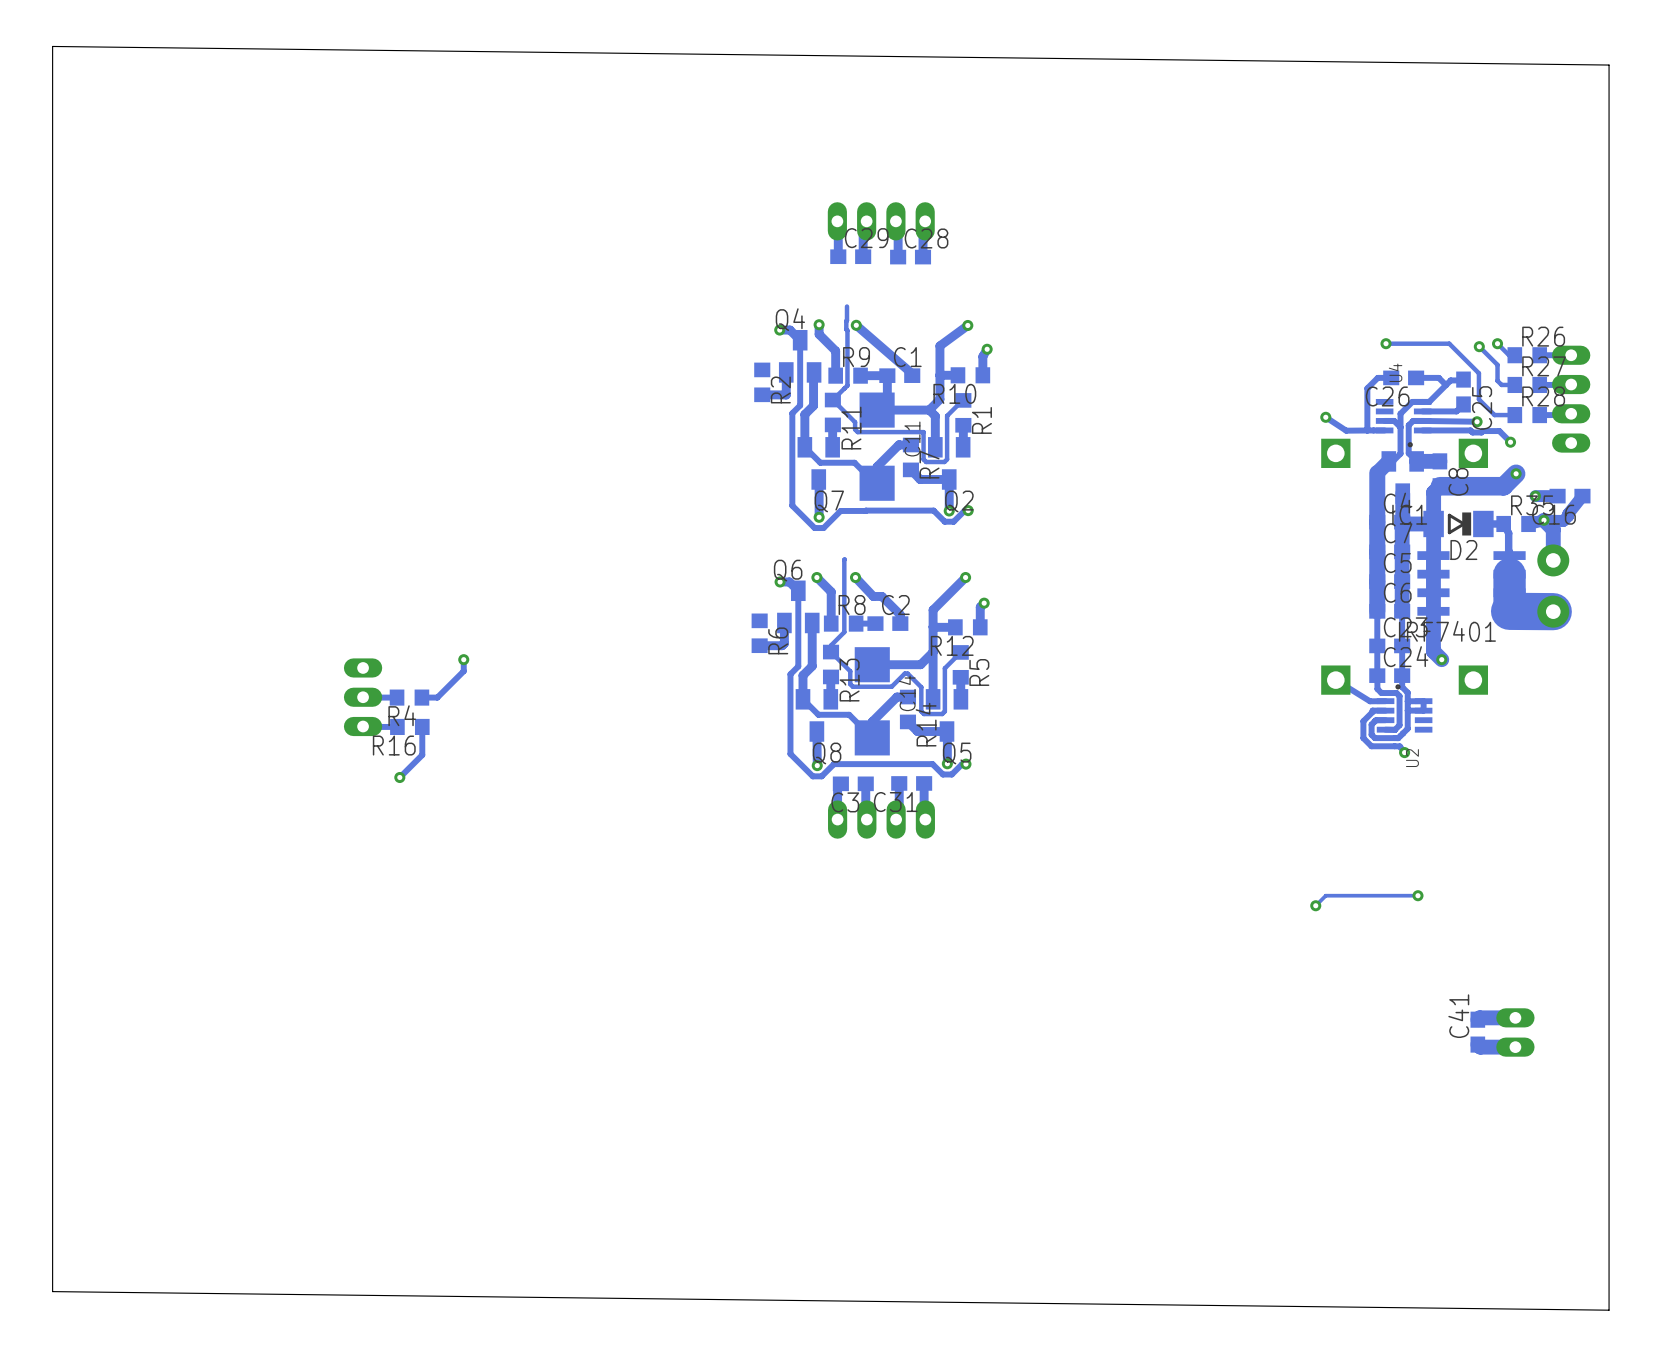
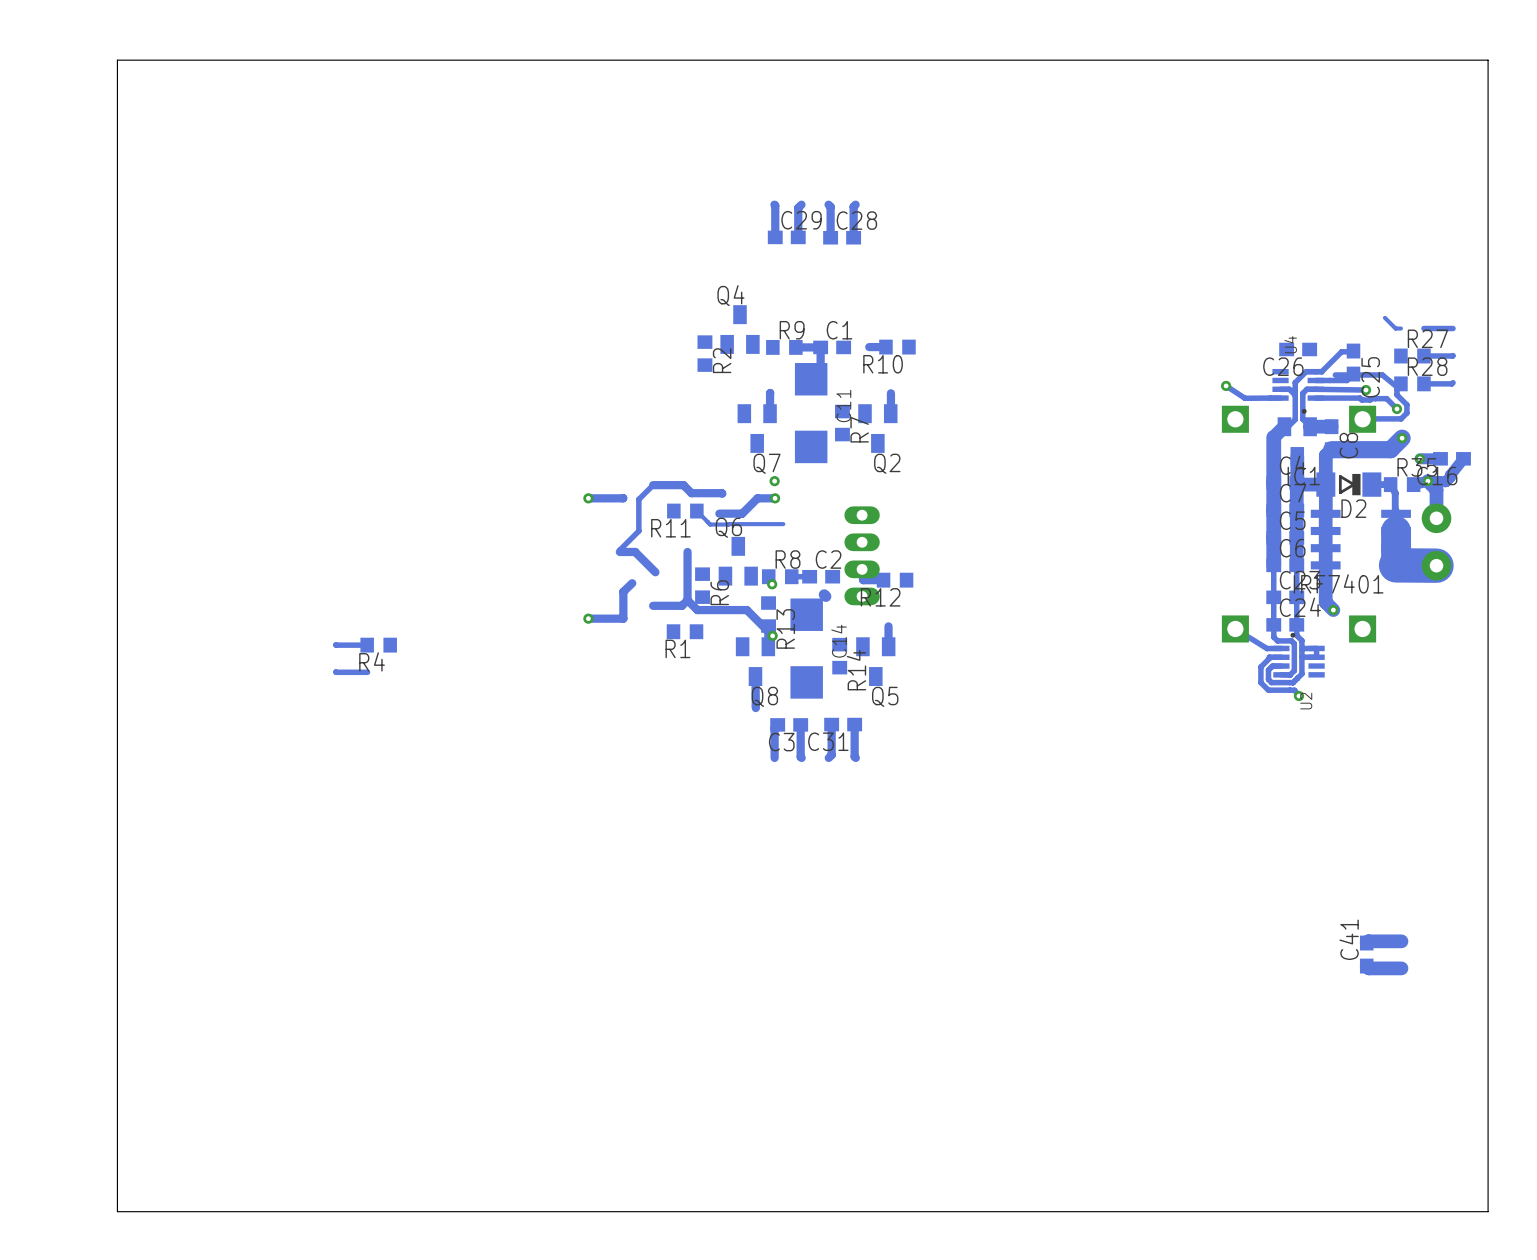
board edge: (1609, 65) (52, 46) (52, 1291) (1609, 1310) -> (1488, 60) (117, 60) (117, 1211) (1488, 1211)
part: (881, 221) -> none
track: (847, 306) (847, 385) (832, 400) (855, 422) (855, 429) (857, 432) (923, 432) (923, 459) (926, 462) (944, 462) (947, 459) (947, 415) (963, 400) -> none
track: (819, 324) (819, 334) (835, 350) (835, 375) -> none
via: (819, 324) -> none
track: (856, 325) (912, 375) -> none
via: (856, 325) -> none
track: (967, 325) (939, 345) (939, 399) (929, 410) -> none
via: (967, 325) -> none
track: (779, 330) (789, 330) (800, 340) (800, 405) (792, 413) (792, 505) (814, 528) (823, 528) (840, 510) (933, 510) (944, 521) (953, 521) (964, 510) (968, 510) -> none
via: (779, 330) -> none
track: (1386, 343) (1449, 343) (1478, 373) (1478, 399) (1494, 415) (1514, 415) -> none
via: (1386, 343) -> none
via: (1497, 343) -> none
track: (1479, 346) (1497, 364) (1497, 380) (1501, 384) (1514, 384) -> none
via: (1479, 346) -> none
track: (987, 349) (982, 356) (982, 375) -> none
via: (987, 349) -> none
R26: (1527, 355) -> none
track: (786, 372) (786, 394) (762, 394) -> none
track: (814, 372) (813, 405) (804, 414) (804, 447) (820, 462) (854, 462) (877, 483) (877, 466) (899, 444) -> none
track: (1391, 377) (1377, 377) (1367, 388) (1367, 430) -> none
track: (1416, 377) (1438, 377) (1446, 385) -> none
part: (1571, 399) -> none
track: none -> (1335, 374) (1382, 374) (1396, 386) (1396, 394) (1406, 404) (1406, 413) (1401, 418) (1362, 418)
track: (929, 410) (877, 410) -> none
track: (929, 410) (935, 416) (935, 447) -> none
R11 rotation: 0° (832, 412) -> 90° clockwise (685, 511)
R11 position: (832, 412) -> (685, 511)
R1 rotation: 0° (963, 412) -> 90° clockwise (685, 631)
R1 position: (963, 412) -> (685, 631)
track: (910, 469) (920, 479) (949, 479) (949, 510) -> none
track: (818, 479) (819, 517) -> none
via: (949, 510) -> none
via: (968, 510) -> none
via: (819, 517) -> none
via: none -> (774, 481)
track: none -> (722, 493) (691, 493) (683, 485) (653, 485) (638, 499) (638, 531) (619, 551) (635, 551) (655, 572)
via: none -> (588, 498)
track: none -> (623, 498) (588, 498)
track: none -> (775, 498) (757, 498) (742, 513) (719, 513)
via: none -> (775, 498)
track: none -> (696, 511) (710, 524) (783, 524)
track: (844, 559) (844, 632) (831, 645) (831, 652) (850, 671) (850, 684) (852, 686) (891, 686) (904, 673) (907, 673) (921, 687) (921, 711) (923, 714) (942, 714) (944, 711) (944, 668) (960, 652) -> none
track: (816, 577) (831, 591) (831, 623) -> none
via: (816, 577) -> none
track: (855, 577) (873, 596) (881, 596) (900, 614) (900, 623) -> none
via: (855, 577) -> none
track: (965, 577) (933, 610) (933, 699) -> none
via: (965, 577) -> none
track: (780, 581) (789, 581) (798, 590) (798, 666) (790, 674) (790, 754) (812, 776) (821, 776) (833, 764) (932, 764) (942, 774) (951, 774) (962, 764) (965, 764) -> none
via: (780, 581) -> none
track: none -> (687, 551) (687, 600)
part: none -> (862, 555)
track: (984, 603) (980, 607) (980, 627) -> none
via: (984, 603) -> none
track: (812, 622) (812, 666) (802, 675) (802, 699) (818, 714) (849, 714) (872, 737) (872, 721) (896, 697) (907, 697) -> none
track: (782, 625) (784, 622) (784, 643) (782, 645) (759, 645) -> none
track: none -> (632, 583) (623, 591) (623, 618) (588, 618)
via: none -> (772, 584)
track: none -> (824, 594) (825, 596)
track: none -> (687, 600) (697, 610) (746, 610) (772, 635)
track: none -> (687, 600) (681, 605) (653, 605)
track: (933, 652) (920, 664) (872, 664) -> none
track: (463, 659) (463, 671) (437, 697) (421, 697) -> none
via: (463, 659) -> none
R5: (960, 664) -> none
via: none -> (588, 618)
via: none -> (772, 635)
part: (363, 697) -> none
track: (907, 721) (917, 731) (947, 731) (947, 763) -> none
R16: (409, 726) -> none
track: (422, 726) (422, 755) (399, 777) -> none
via: (947, 763) -> none
via: (965, 764) -> none
via: (817, 765) -> none
via: (399, 777) -> none
part: (881, 819) -> none
track: (1417, 895) (1325, 895) (1315, 905) -> none
via: (1417, 895) -> none
via: (1315, 905) -> none
part: (1515, 1032) -> none

